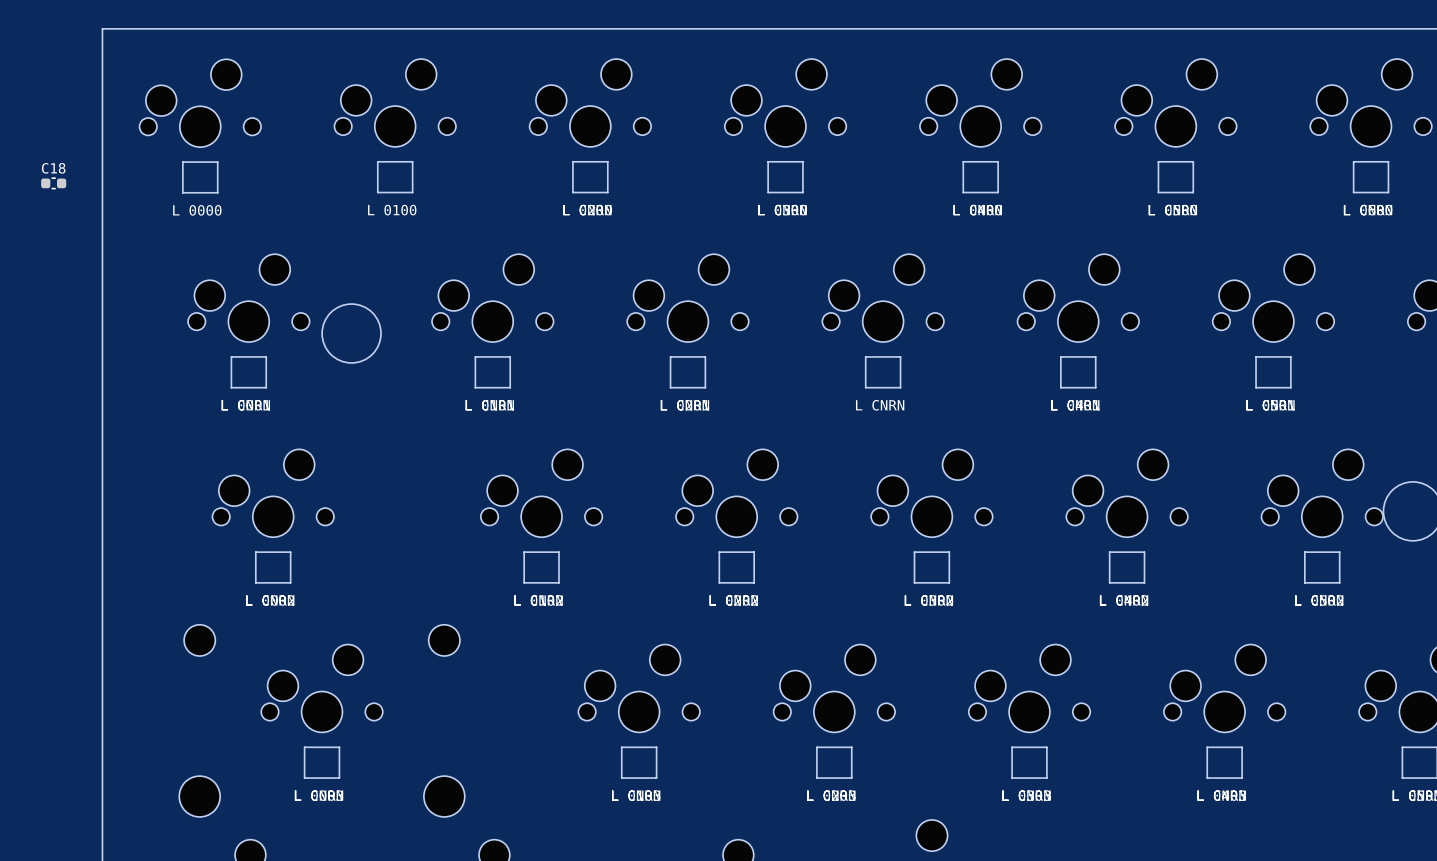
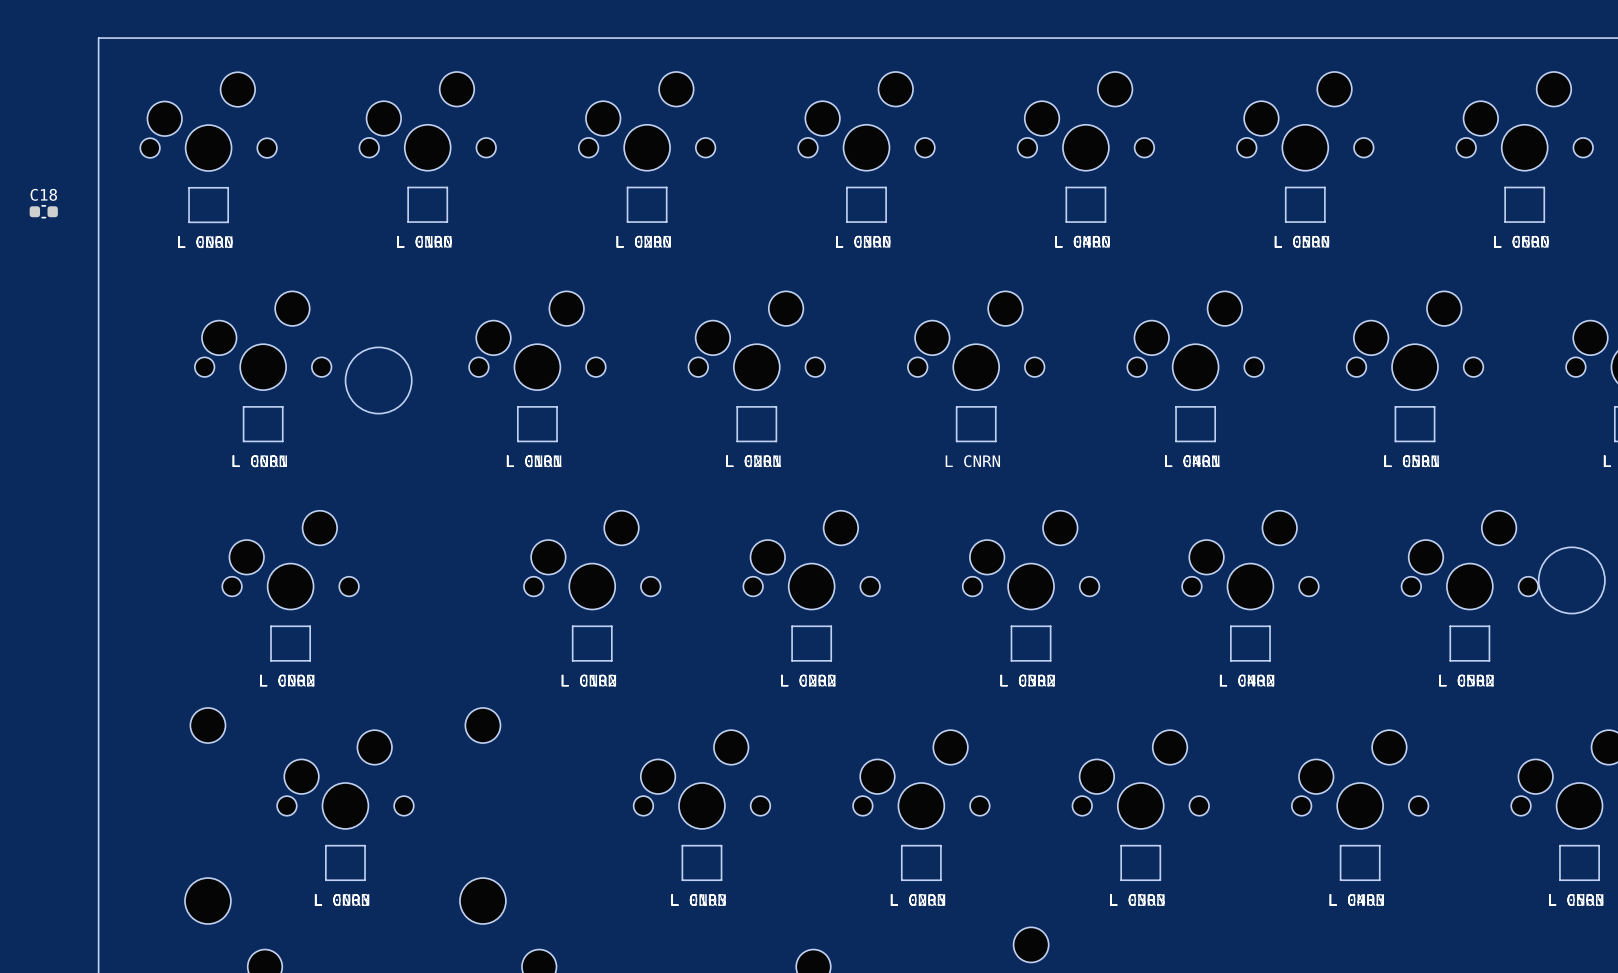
part footprint: [139, 59, 262, 194] -> [140, 72, 277, 224]
part footprint: [334, 59, 456, 194] -> [359, 71, 497, 223]

